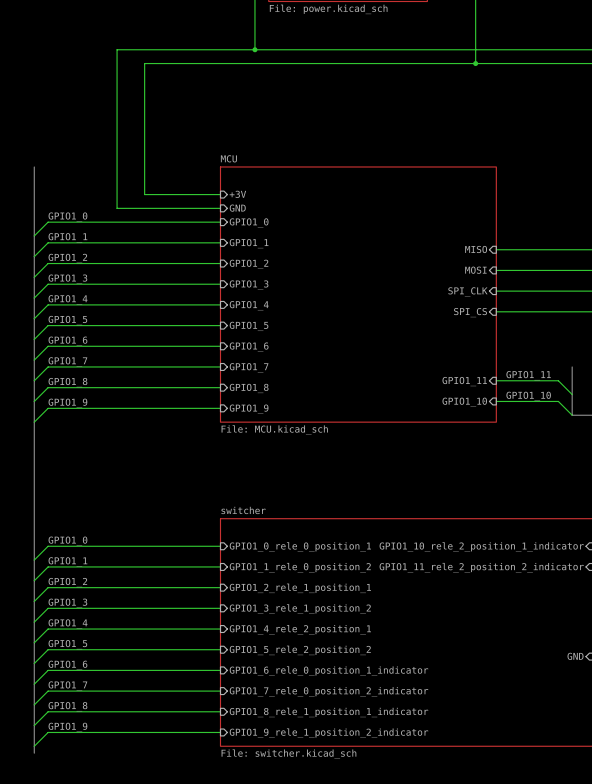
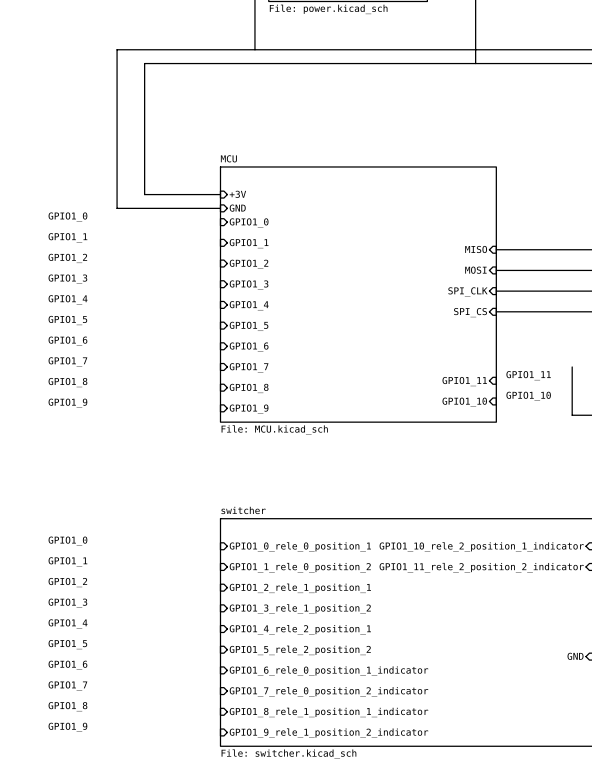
junction: (254, 49) -> none
junction: (475, 63) -> none
bus: (34, 166) (34, 753) -> none
wire: (220, 222) (48, 222) (34, 235) -> none
wire: (220, 242) (48, 242) (34, 256) -> none
wire: (220, 263) (48, 263) (34, 277) -> none
wire: (220, 284) (48, 284) (34, 298) -> none
wire: (220, 304) (48, 304) (34, 318) -> none
wire: (220, 325) (48, 325) (34, 339) -> none
wire: (220, 346) (48, 346) (34, 360) -> none
wire: (220, 366) (48, 366) (34, 380) -> none
wire: (496, 380) (558, 380) (572, 394) -> none
wire: (220, 387) (48, 387) (34, 401) -> none
wire: (496, 401) (558, 401) (572, 415) -> none
wire: (220, 408) (48, 408) (34, 422) -> none
wire: (220, 546) (48, 546) (34, 560) -> none
wire: (220, 566) (48, 566) (34, 580) -> none
wire: (220, 587) (48, 587) (34, 601) -> none
wire: (220, 608) (48, 608) (34, 622) -> none
wire: (220, 629) (48, 629) (34, 642) -> none
wire: (220, 649) (48, 649) (34, 663) -> none
wire: (220, 670) (48, 670) (34, 684) -> none
wire: (220, 691) (48, 691) (34, 704) -> none
wire: (220, 711) (48, 711) (34, 725) -> none
wire: (220, 732) (48, 732) (34, 746) -> none

